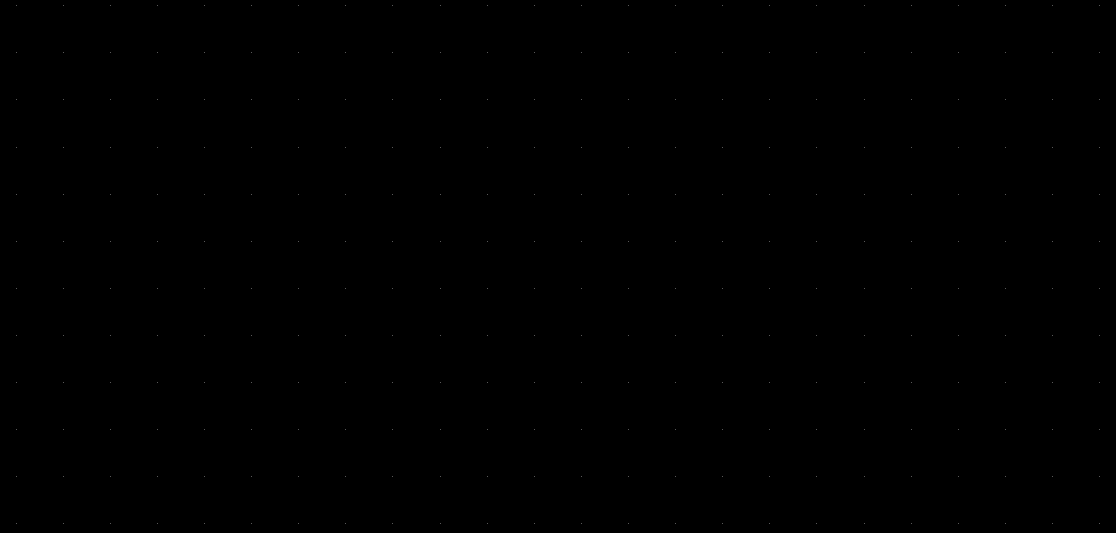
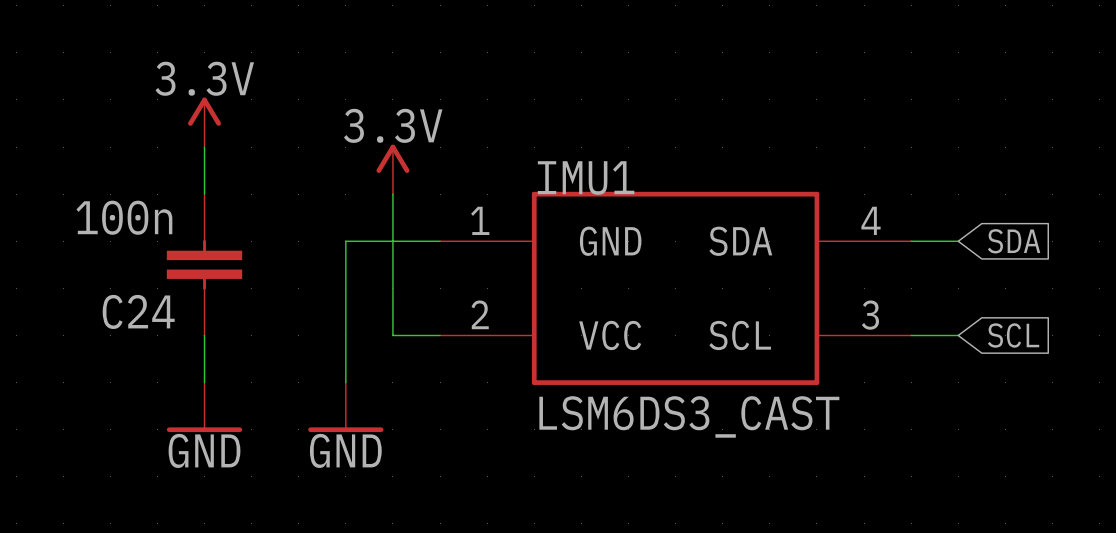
power symbol: none -> 3.3V (204, 122)
wire: none -> (204, 147) (204, 194)
power symbol: none -> 3.3V (392, 169)
wire: none -> (392, 194) (392, 335) (440, 335)
wire: none -> (440, 241) (345, 241) (345, 382)
wire: none -> (911, 241) (958, 241)
global label: none -> SDA (1014, 241)
C24: none -> 100n (204, 264)
IMU1: none -> LSM6DS3_CAST (675, 288)
wire: none -> (204, 335) (204, 382)
wire: none -> (911, 335) (958, 335)
global label: none -> SCL (1013, 335)
power symbol: none -> GND (204, 407)
power symbol: none -> GND (345, 407)

